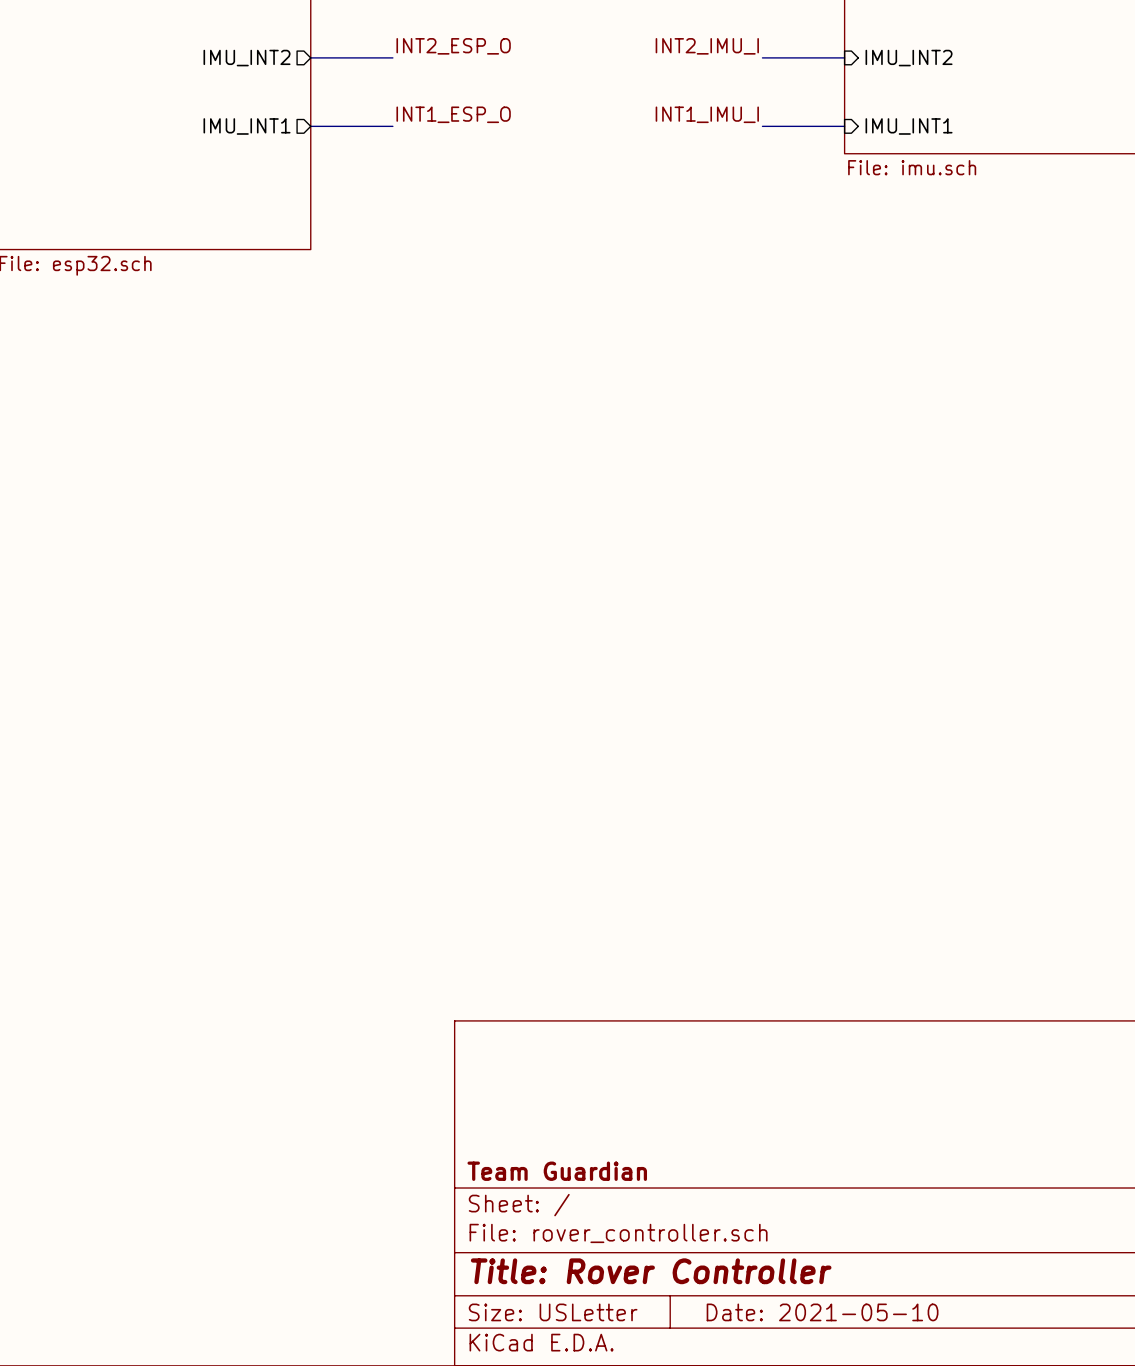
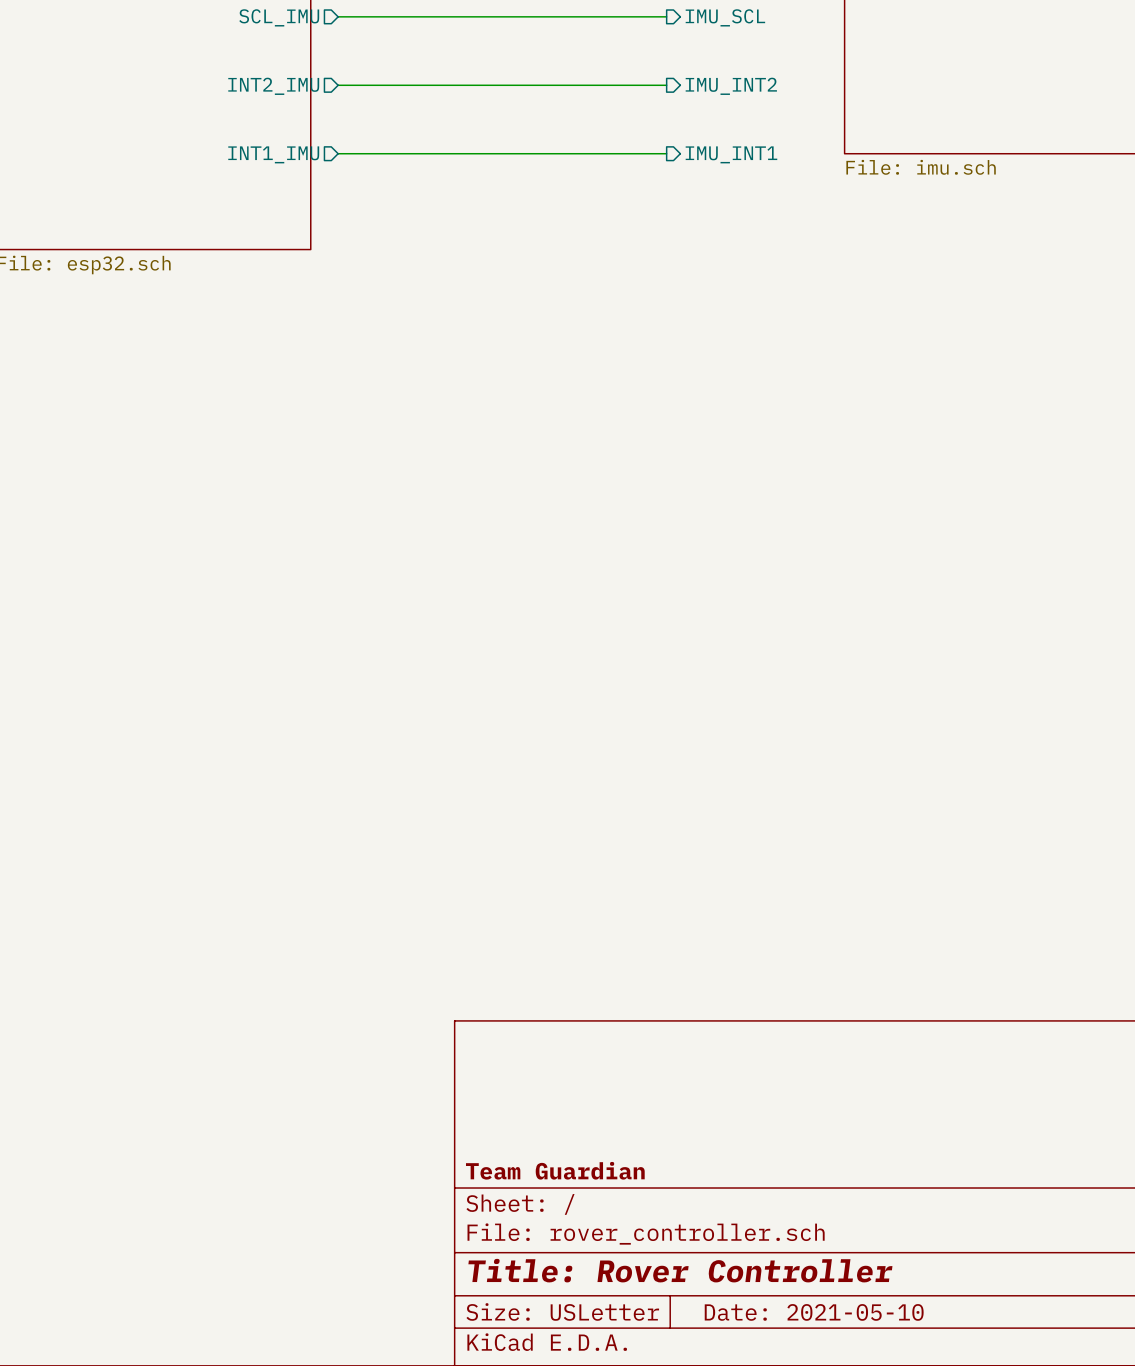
sheet pin: none -> SCL_IMU (279, 17)
wire: none -> (338, 16) (666, 16)
sheet pin: none -> IMU_SCL (725, 17)
label: INT2_ESP_O (453, 46) -> none
label: INT2_IMU_I (707, 46) -> none
wire: (310, 57) (392, 57) -> none
wire: (762, 57) (844, 57) -> none
sheet pin: IMU_INT2 (246, 58) -> none
sheet pin position: IMU_INT2 (909, 58) -> IMU_INT2 (731, 86)
sheet pin: none -> INT2_IMU (273, 86)
wire: none -> (338, 85) (666, 85)
label: INT1_ESP_O (453, 114) -> none
label: INT1_IMU_I (707, 114) -> none
sheet pin: IMU_INT1 (246, 126) -> none
wire: (310, 126) (392, 126) -> none
wire: (762, 126) (844, 126) -> none
sheet pin position: IMU_INT1 (909, 126) -> IMU_INT1 (731, 154)
sheet pin: none -> INT1_IMU (273, 154)
wire: none -> (338, 153) (666, 153)

